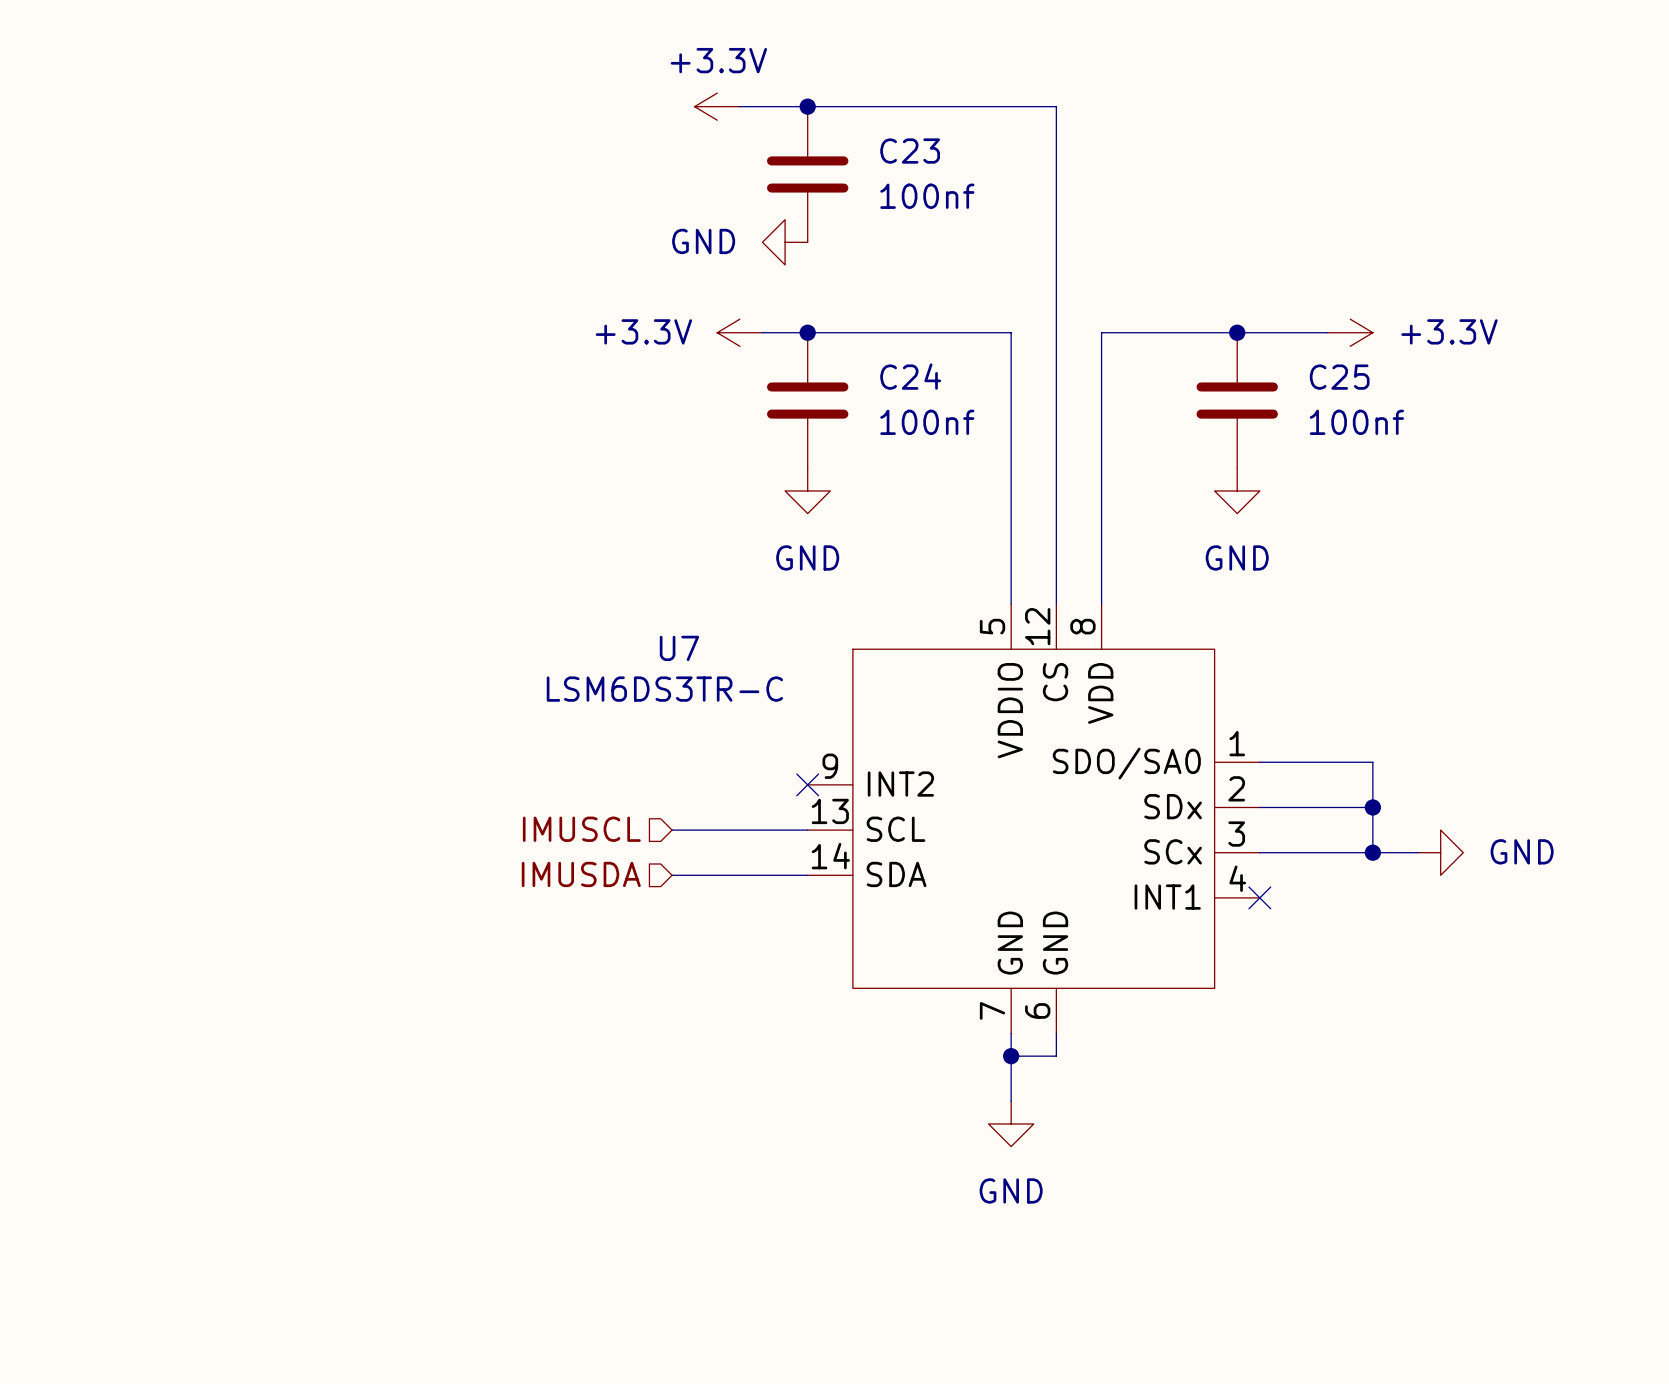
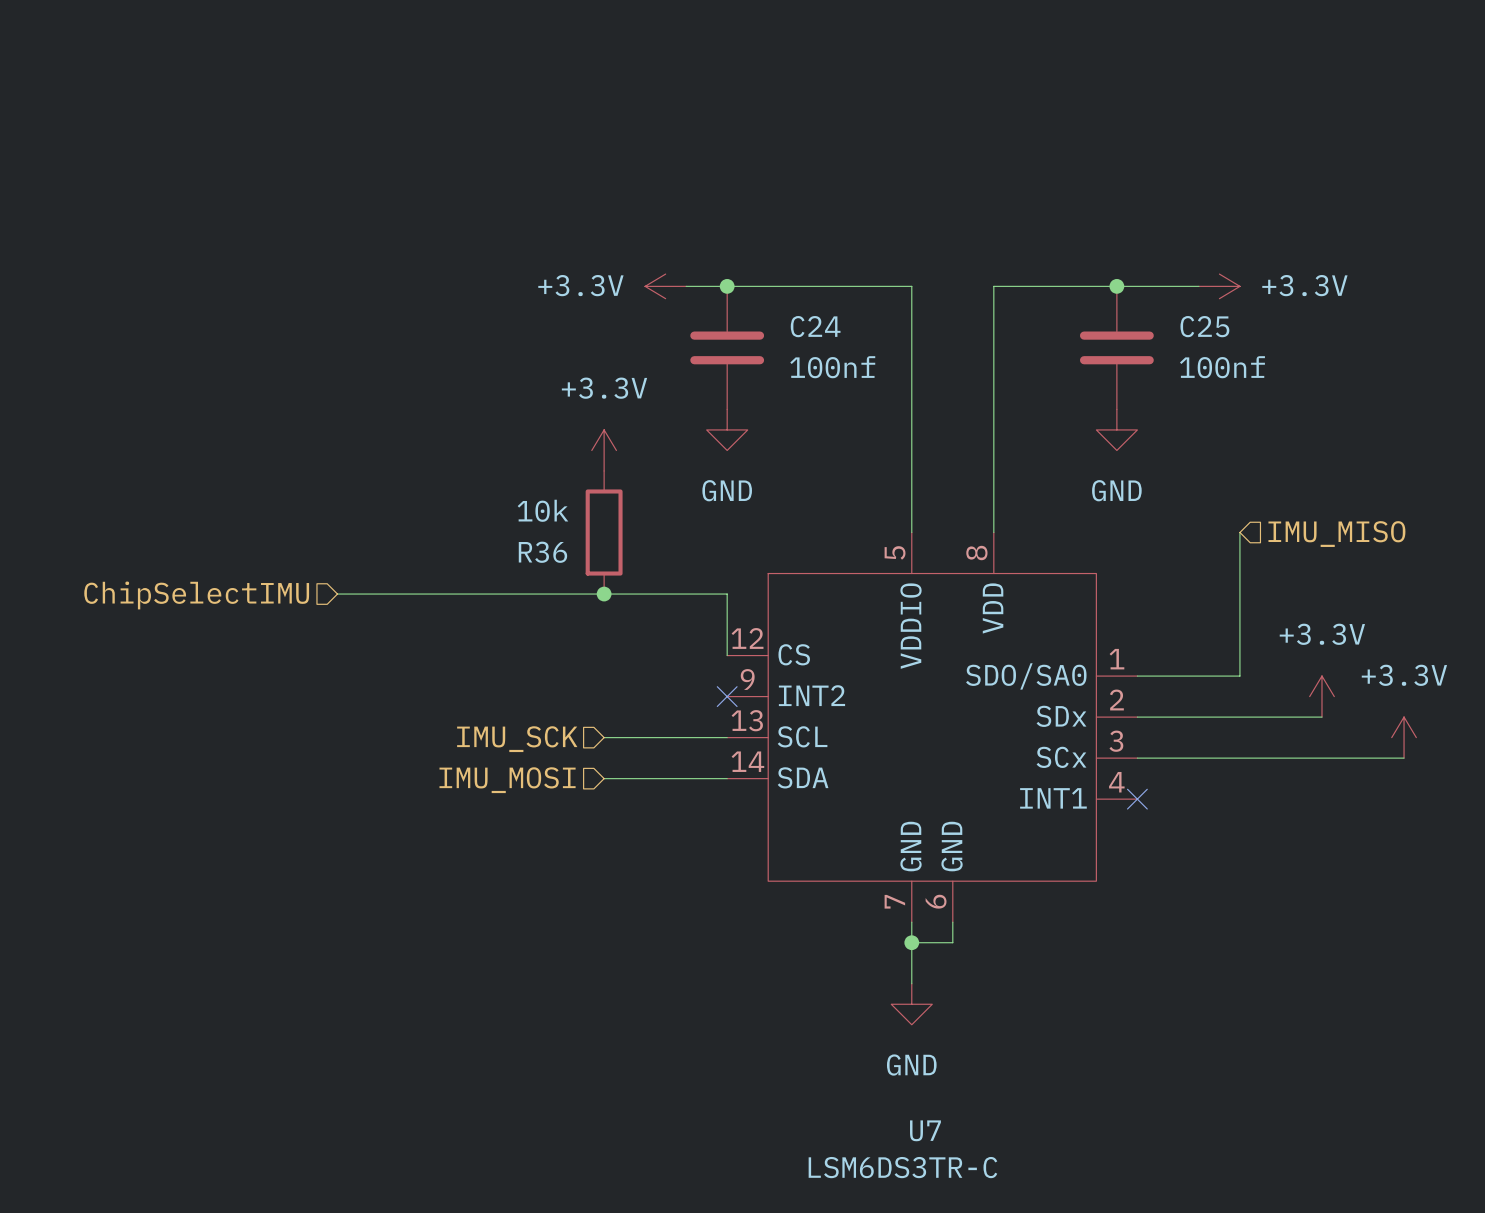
power symbol rotation: 0° (717, 106) -> 90° clockwise (604, 450)
power symbol position: +3.3V (717, 106) -> +3.3V (604, 450)
wire: (739, 106) (1056, 106) (1056, 604) -> none
junction: (807, 106) -> none
C23: 100nf (807, 174) -> none
power symbol: GND (785, 242) -> none
R36: none -> 10k (604, 532)
U7 symbol: [807, 604, 1260, 1034] -> [727, 532, 1138, 923]
hierarchical label: none -> IMU_MISO (1336, 534)
U7 name position: U7 (679, 648) -> U7 (925, 1130)
wire: none -> (337, 594) (727, 594) (727, 655)
junction: none -> (604, 594)
hierarchical label: none -> ChipSelectIMU (196, 595)
U7 value position: LSM6DS3TR-C (664, 689) -> LSM6DS3TR-C (902, 1167)
wire: (1372, 762) (1372, 852) -> (1239, 676) (1239, 532)
power symbol: none -> +3.3V (1321, 696)
wire: none -> (1239, 717) (1321, 717)
junction: (1372, 807) -> none
hierarchical label: IMUSCL (581, 829) -> IMU_SCK (517, 739)
power symbol: none -> +3.3V (1404, 737)
junction: (1372, 852) -> none
wire: none -> (1280, 758) (1404, 758)
power symbol: GND (1440, 852) -> none
hierarchical label: IMUSDA (581, 874) -> IMU_MOSI (507, 780)

